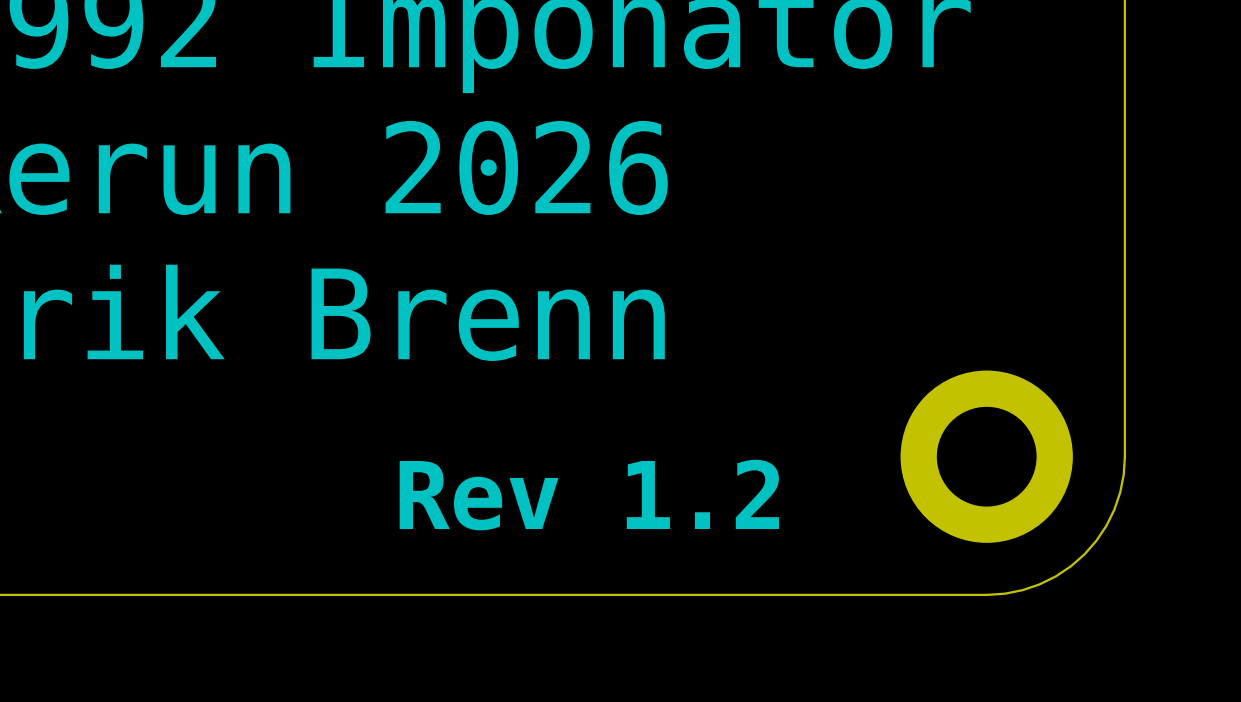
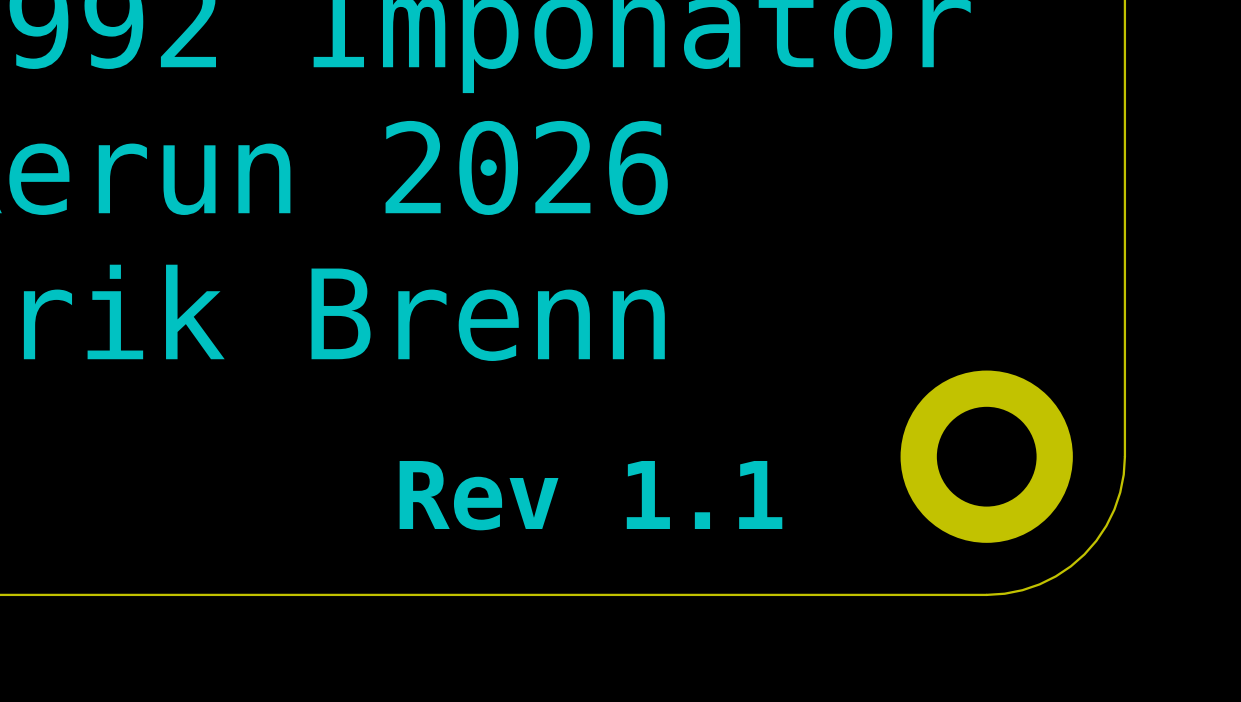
text: Rev 1.2 (589, 495) -> Rev 1.1 (590, 495)

